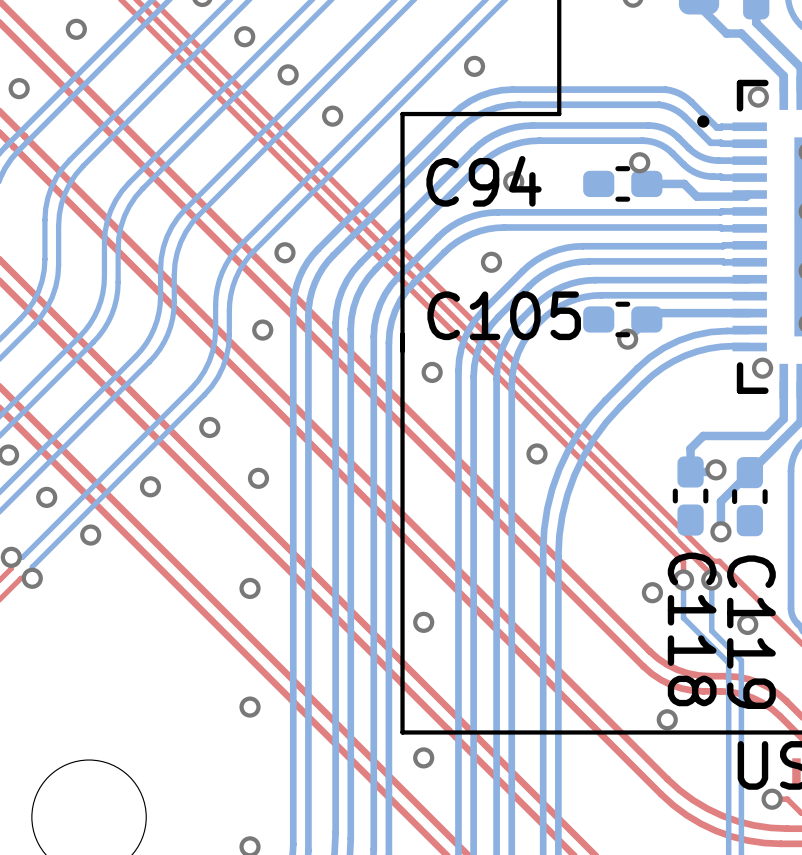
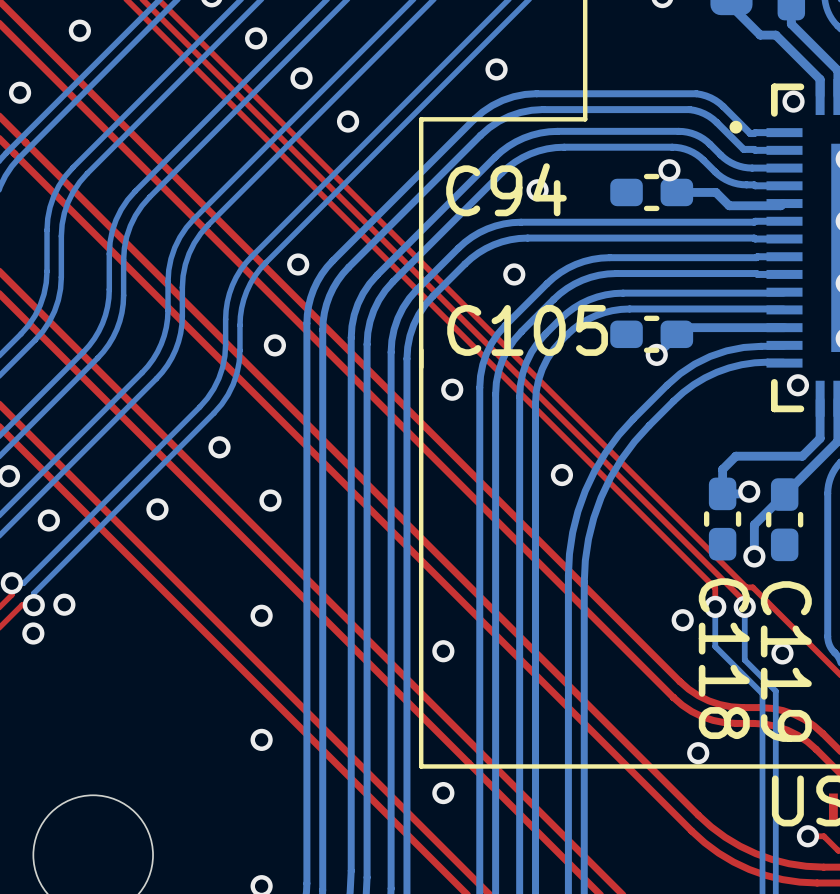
via: (90, 535) -> none
via: none -> (64, 604)
via: none -> (33, 633)

